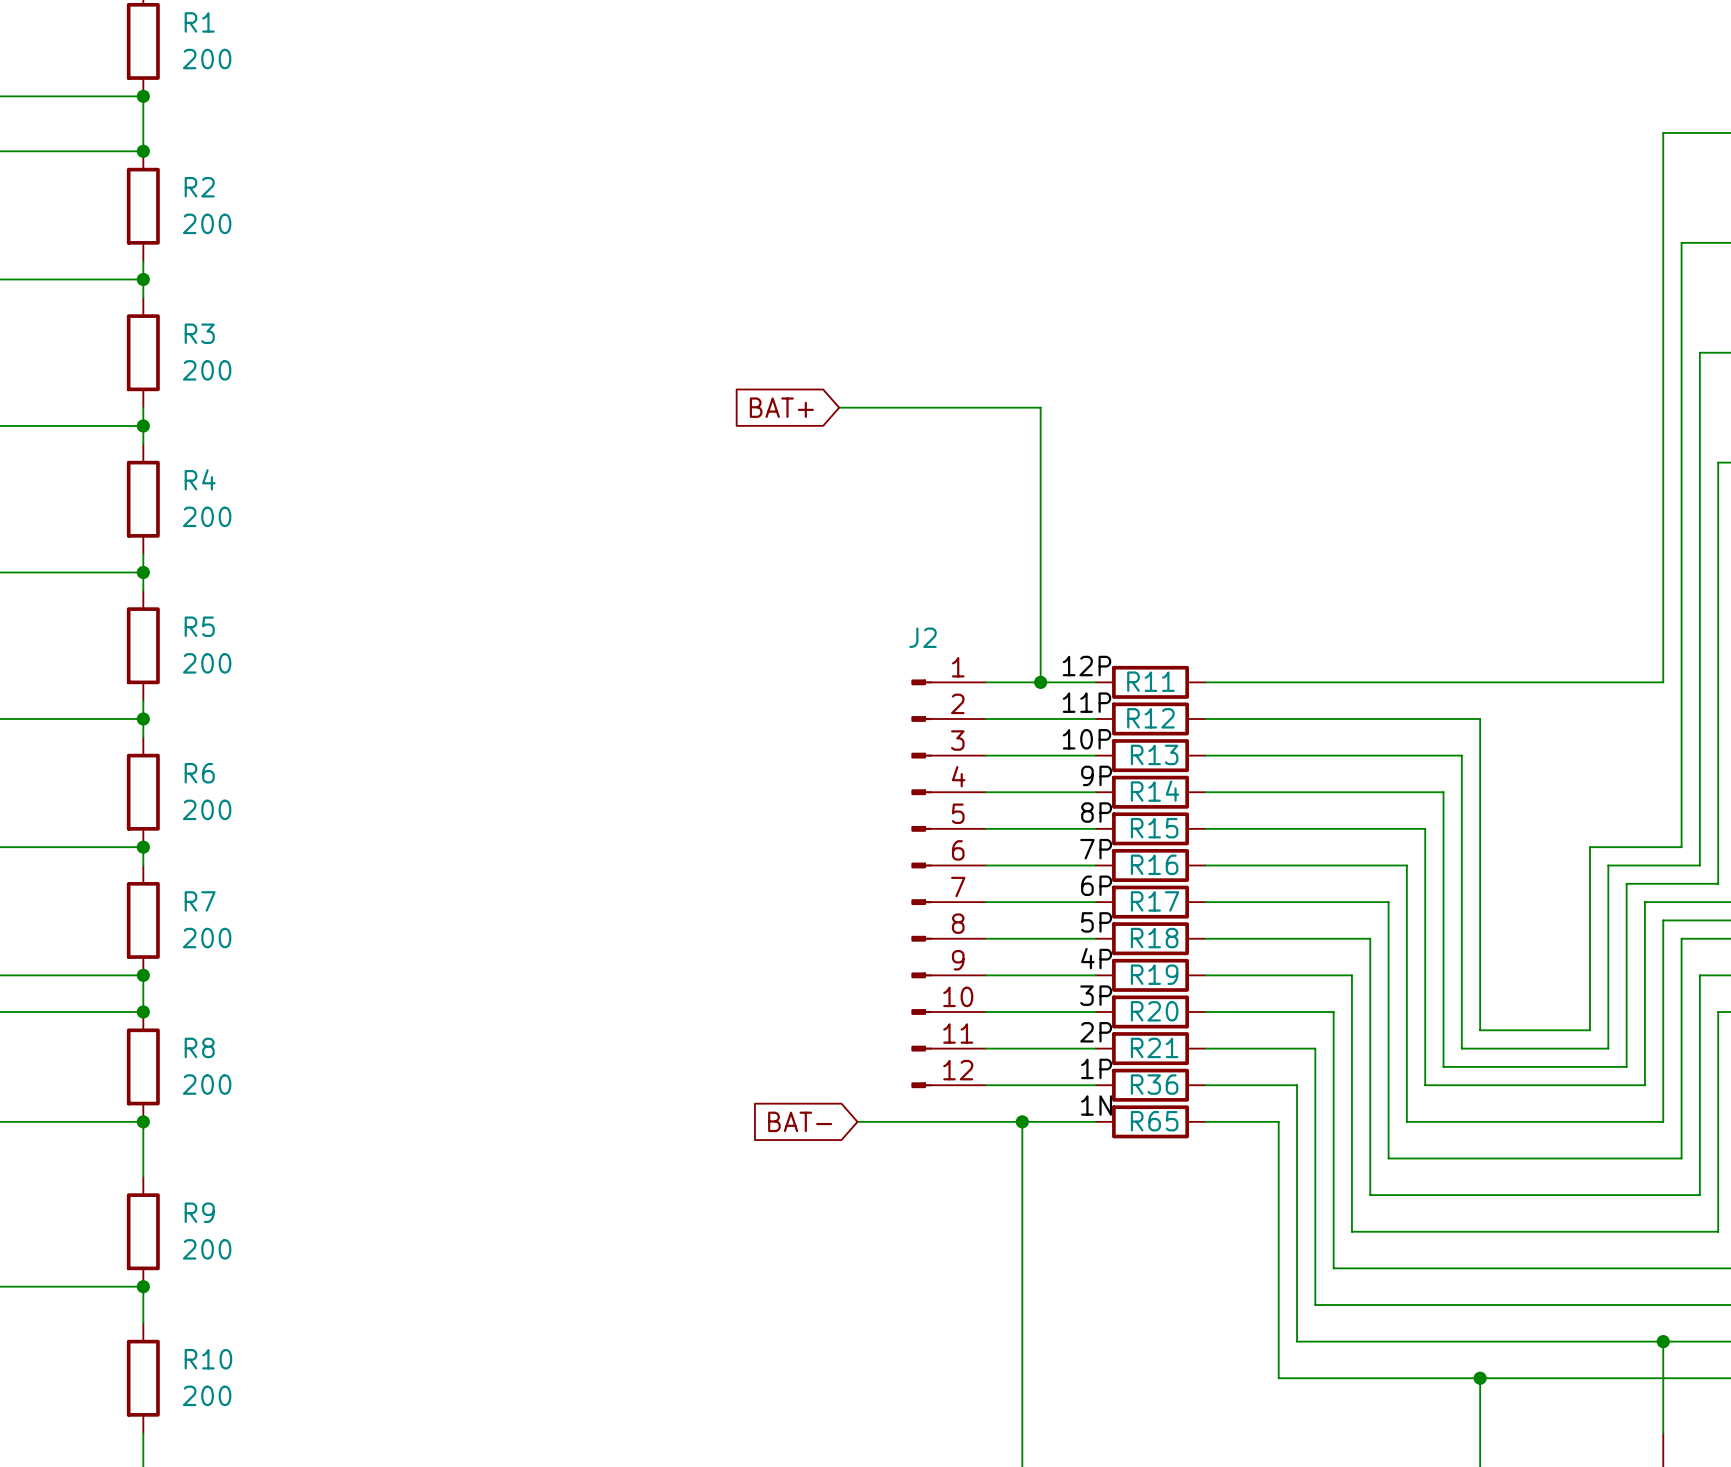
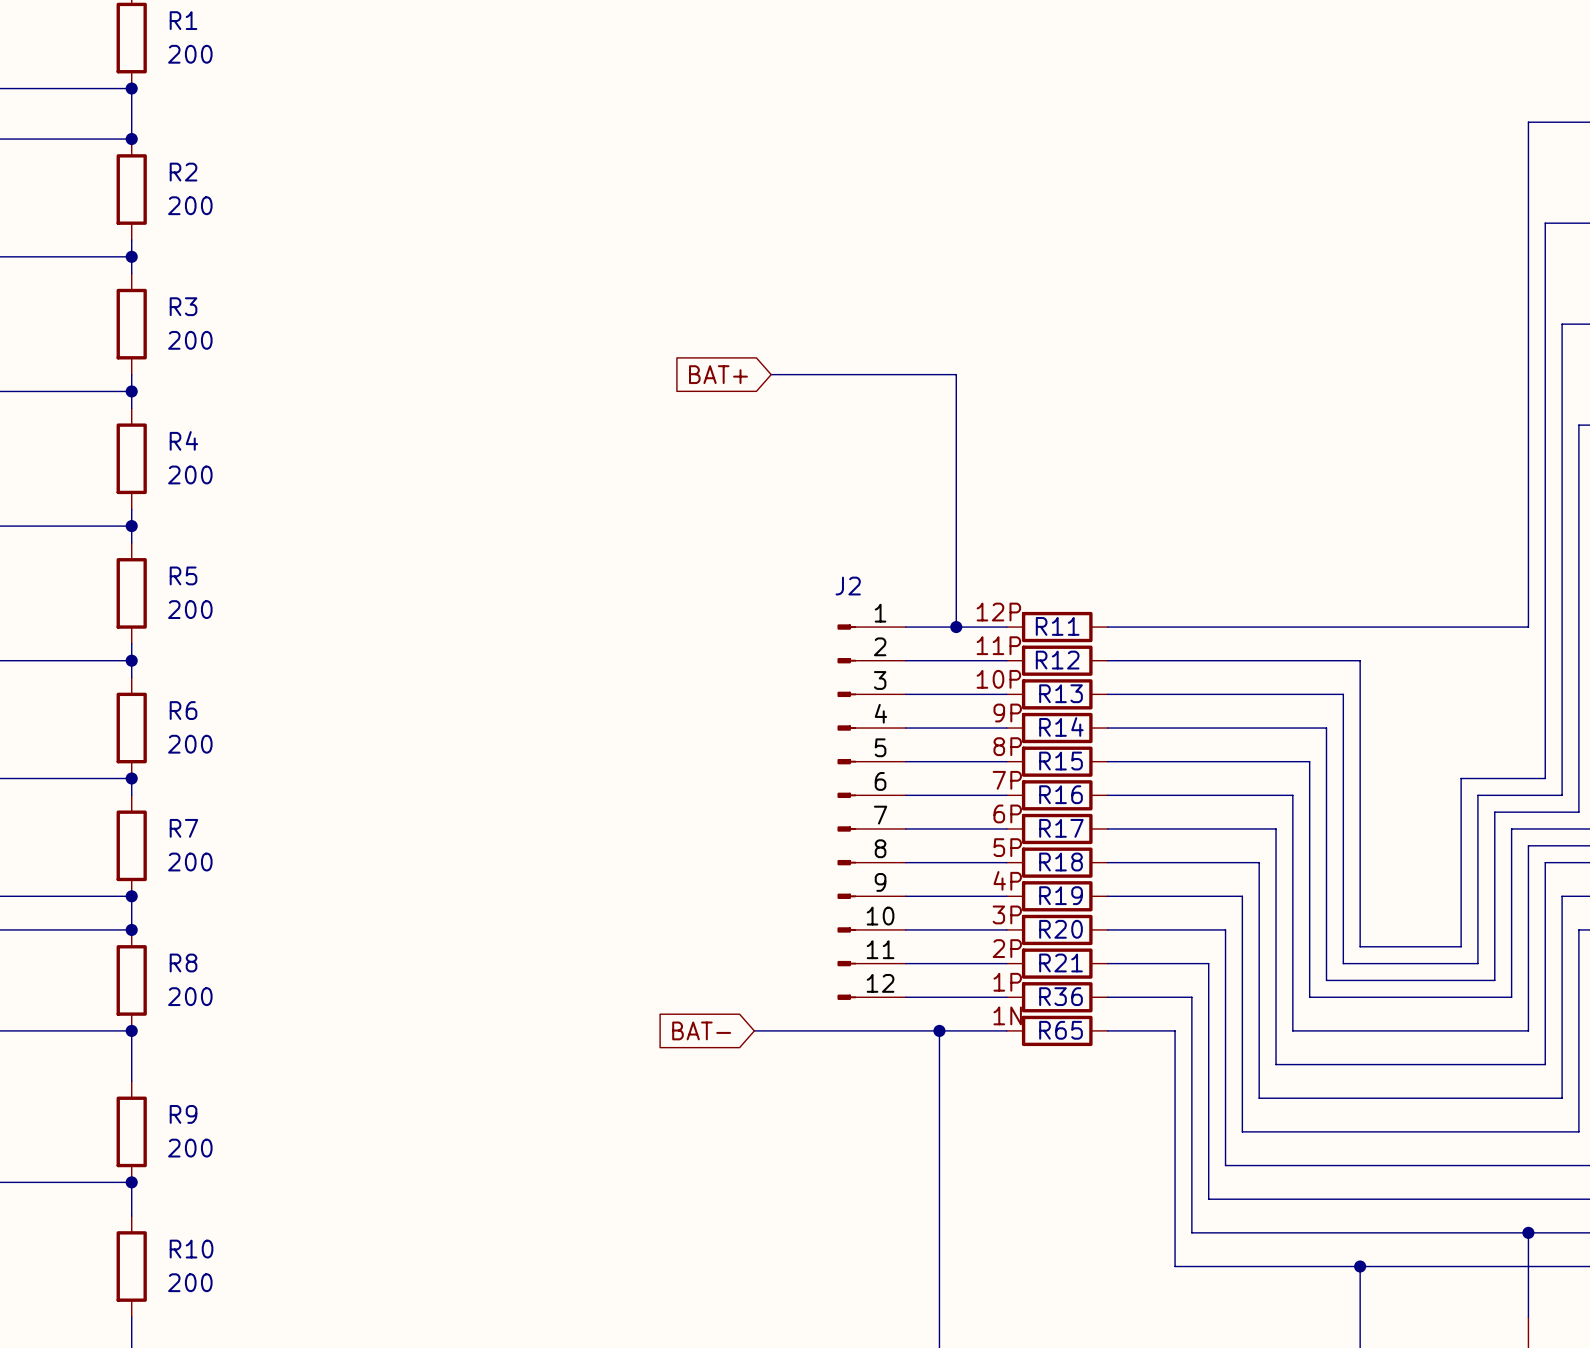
global label position: BAT- (800, 1121) -> BAT- (701, 1030)
wire: none -> (754, 1030) (788, 1030)

